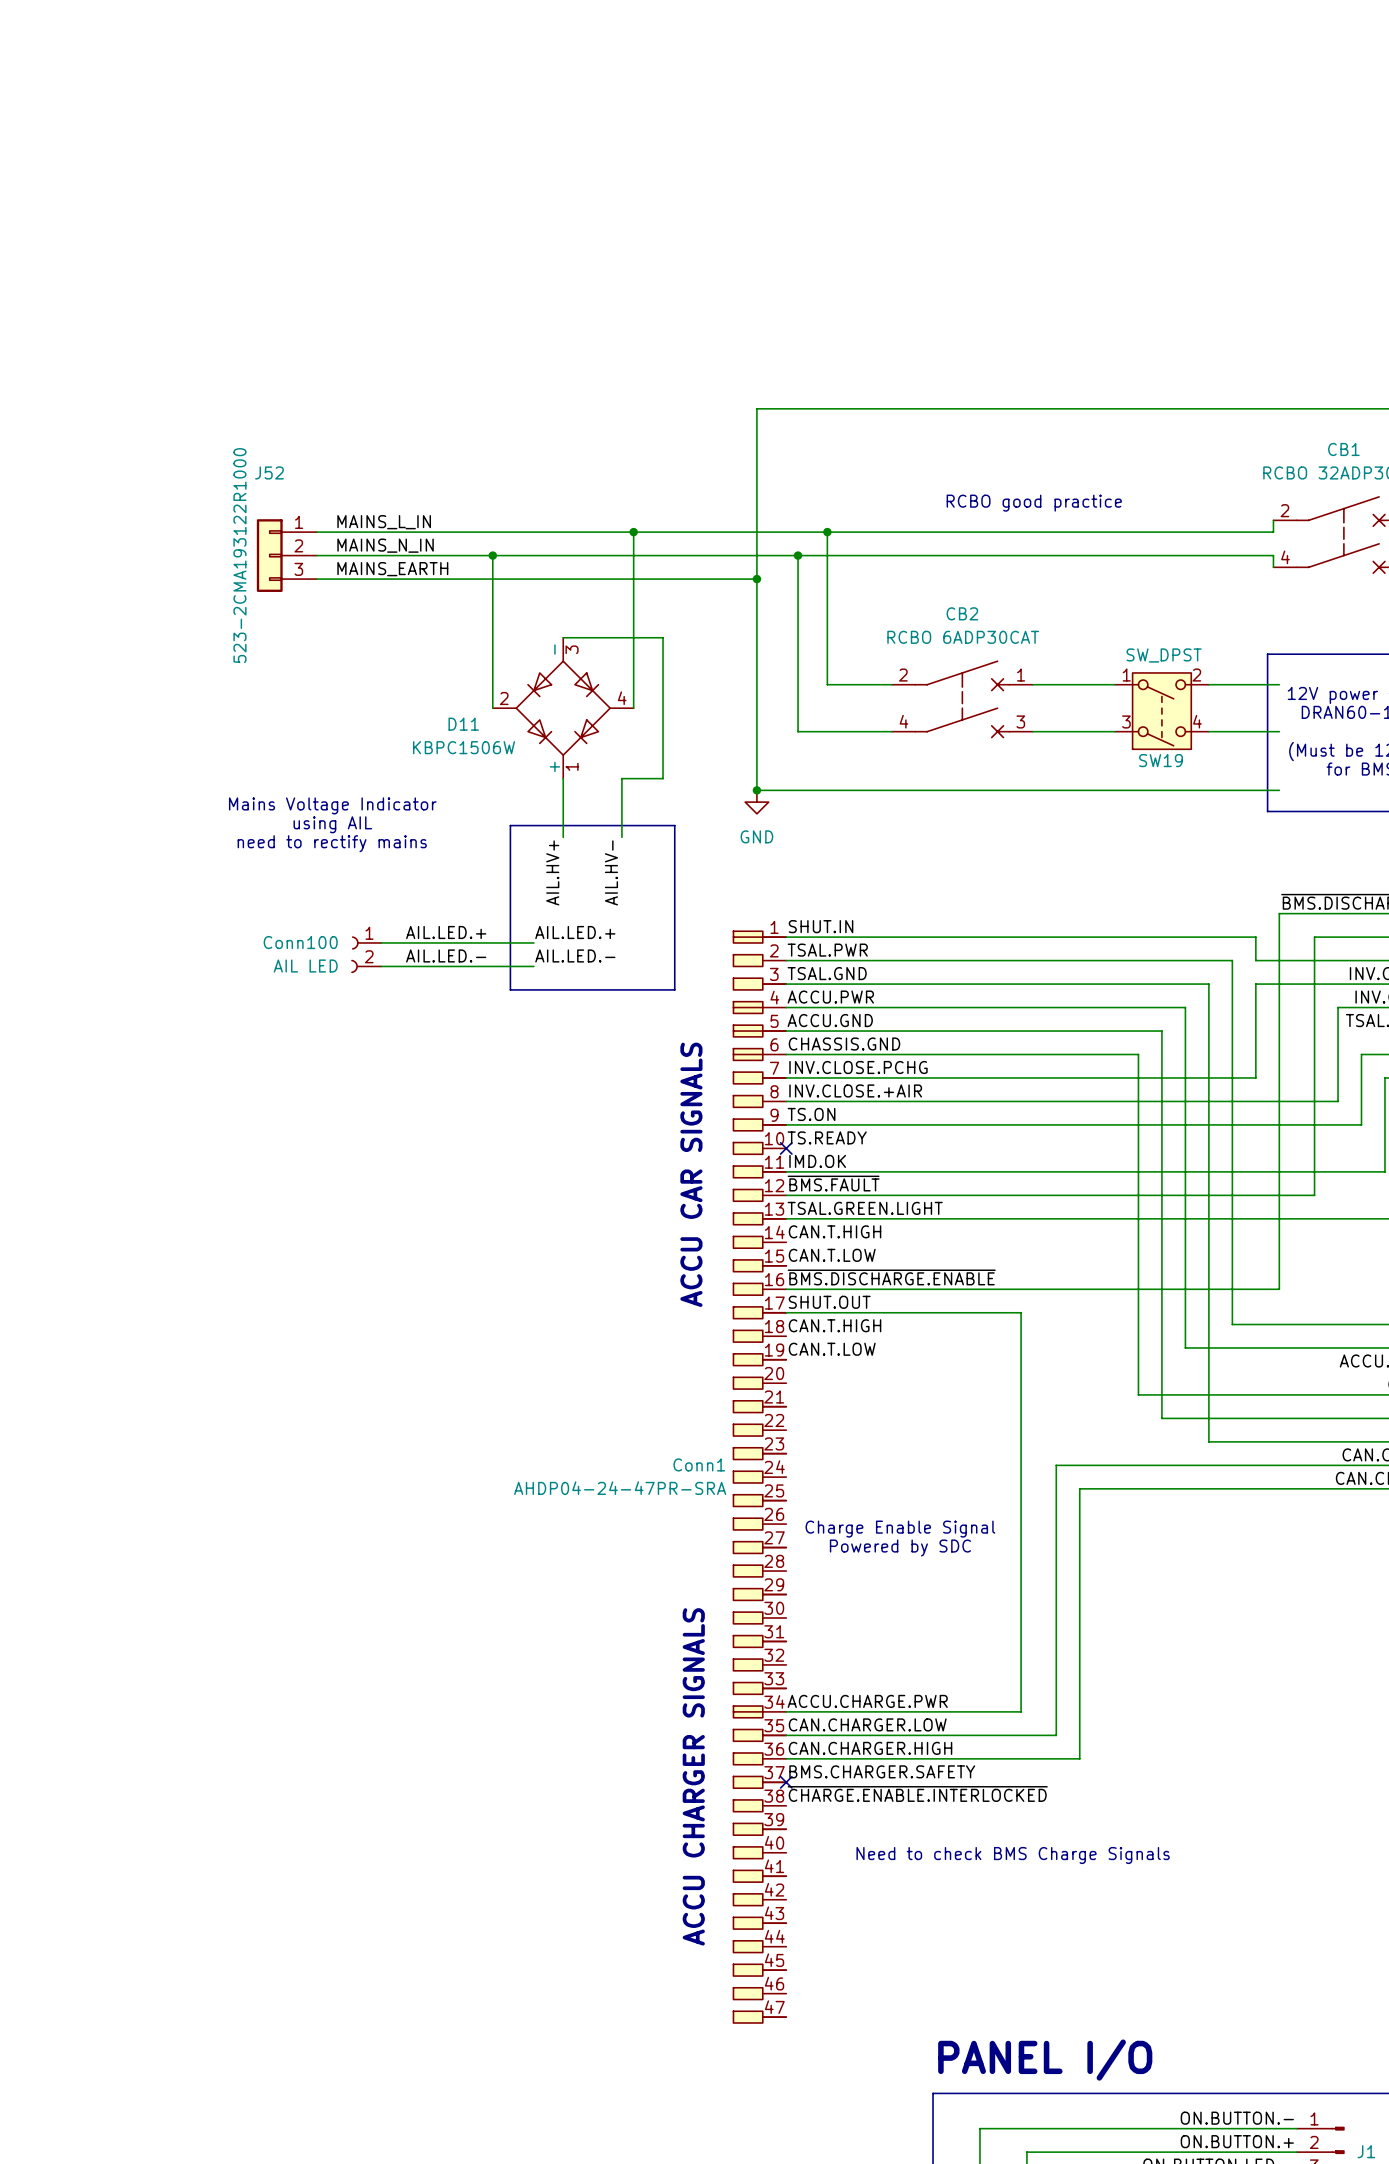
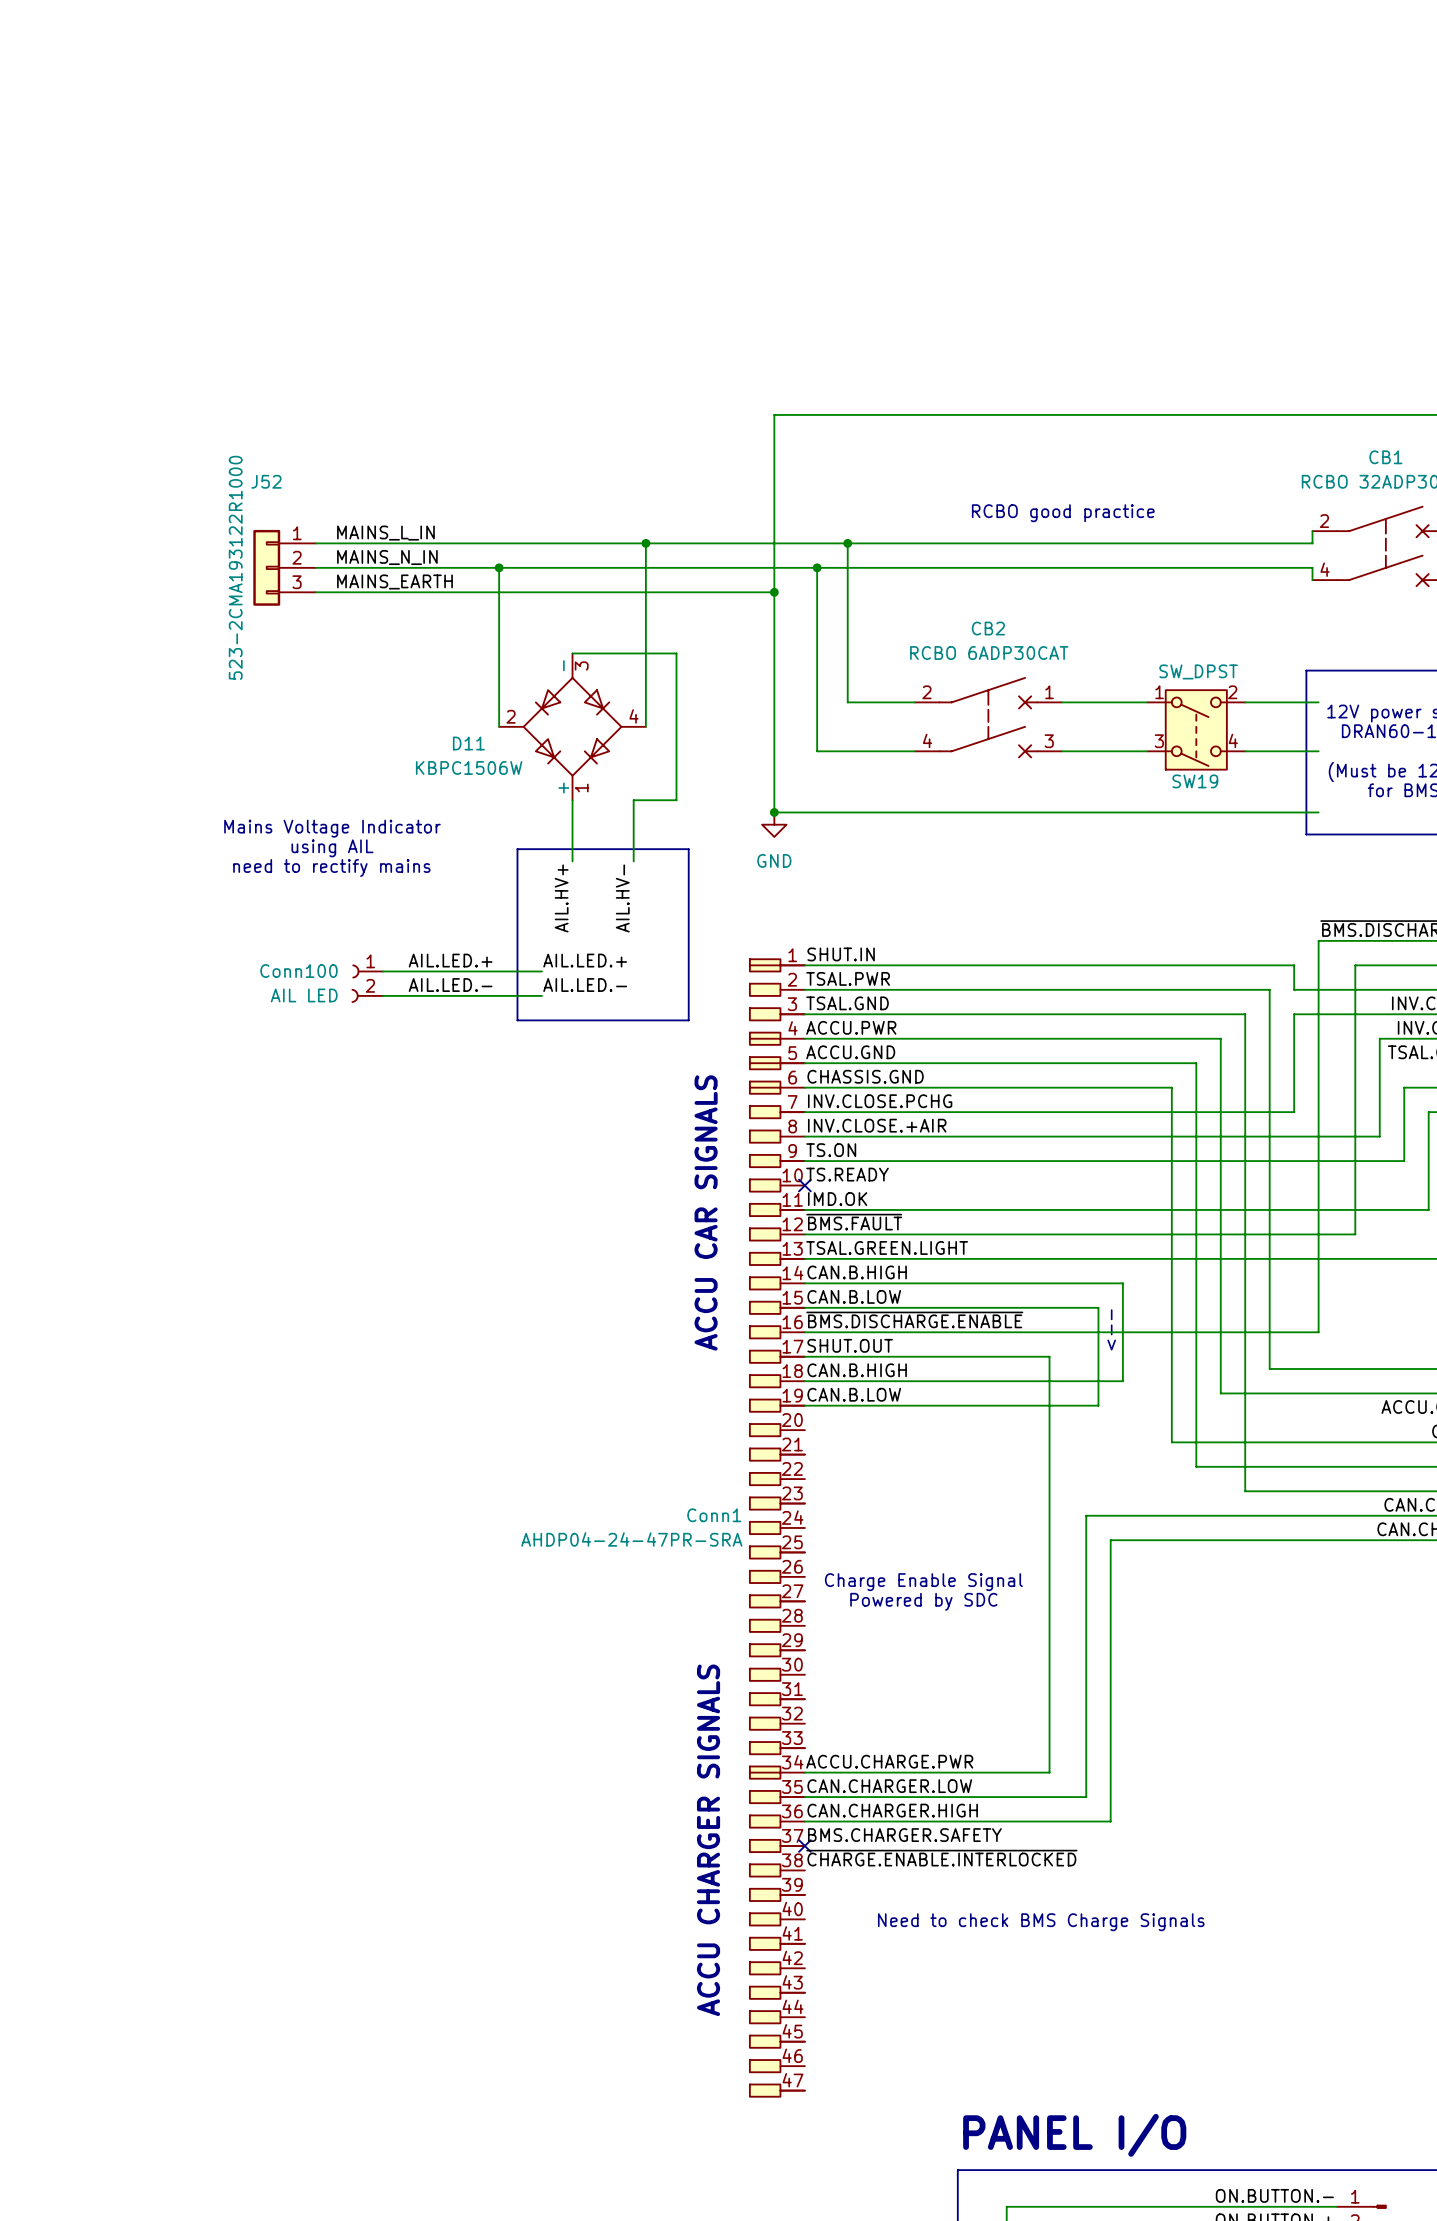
label: CAN.T.HIGH (835, 1231) -> CAN.B.HIGH (857, 1272)
wire: none -> (804, 1283) (1122, 1283) (1122, 1381) (804, 1381)
label: CAN.T.LOW (832, 1255) -> CAN.B.LOW (854, 1296)
wire: none -> (804, 1307) (1098, 1307) (1098, 1405) (804, 1405)
text: none -> <-- (1111, 1329)
label: CAN.T.HIGH (835, 1325) -> CAN.B.HIGH (857, 1370)
label: CAN.T.LOW (832, 1349) -> CAN.B.LOW (854, 1394)

